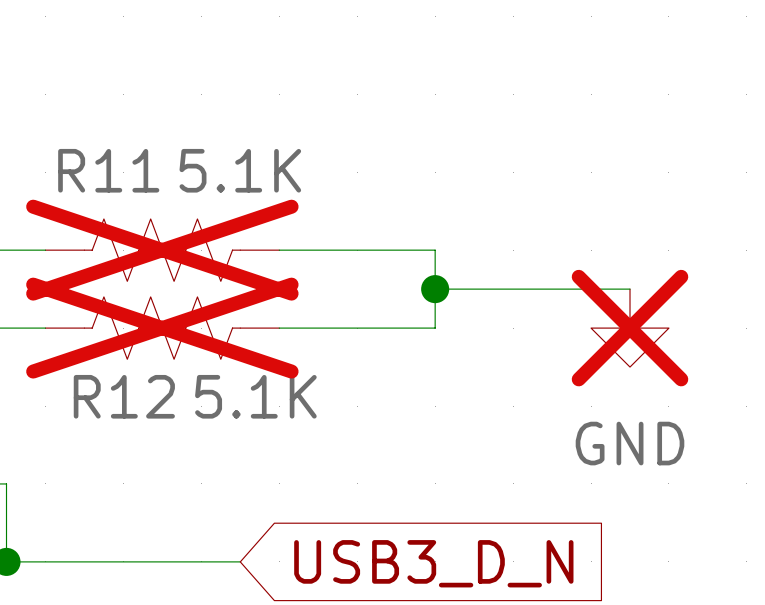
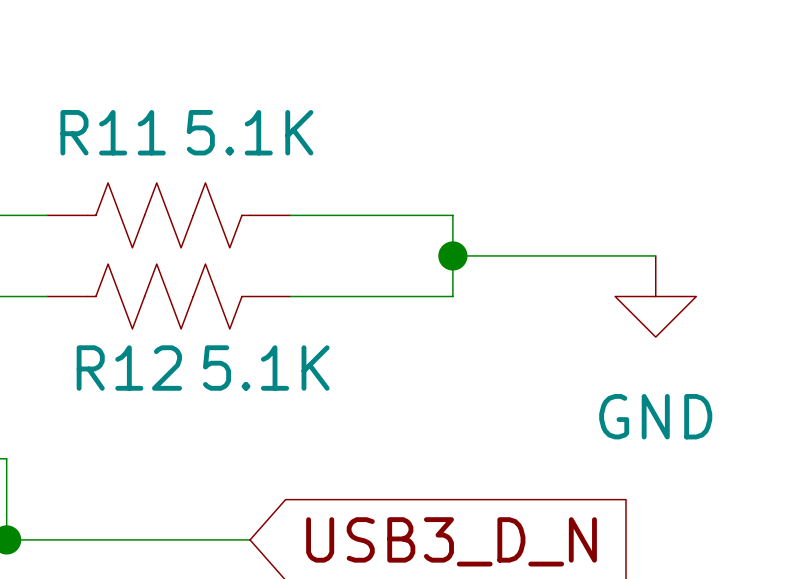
R11 do-not-place cross: (162, 250) -> none
R12 do-not-place cross: (162, 328) -> none
power symbol do-not-place cross: (630, 328) -> none

